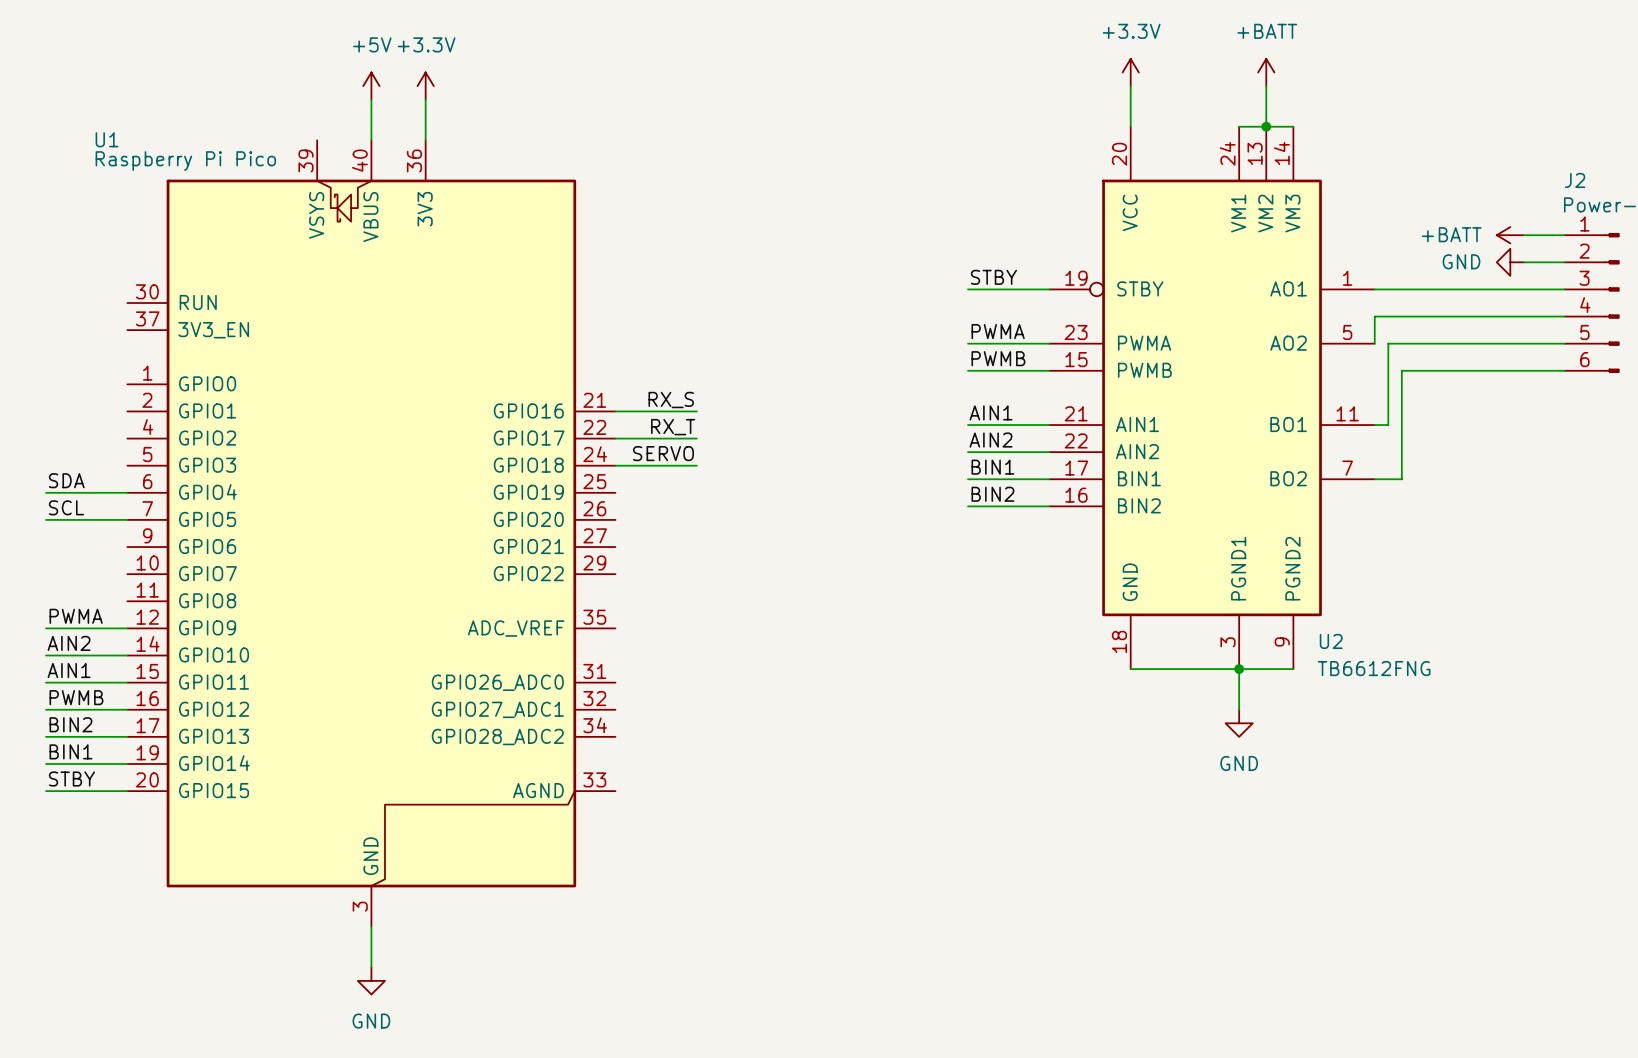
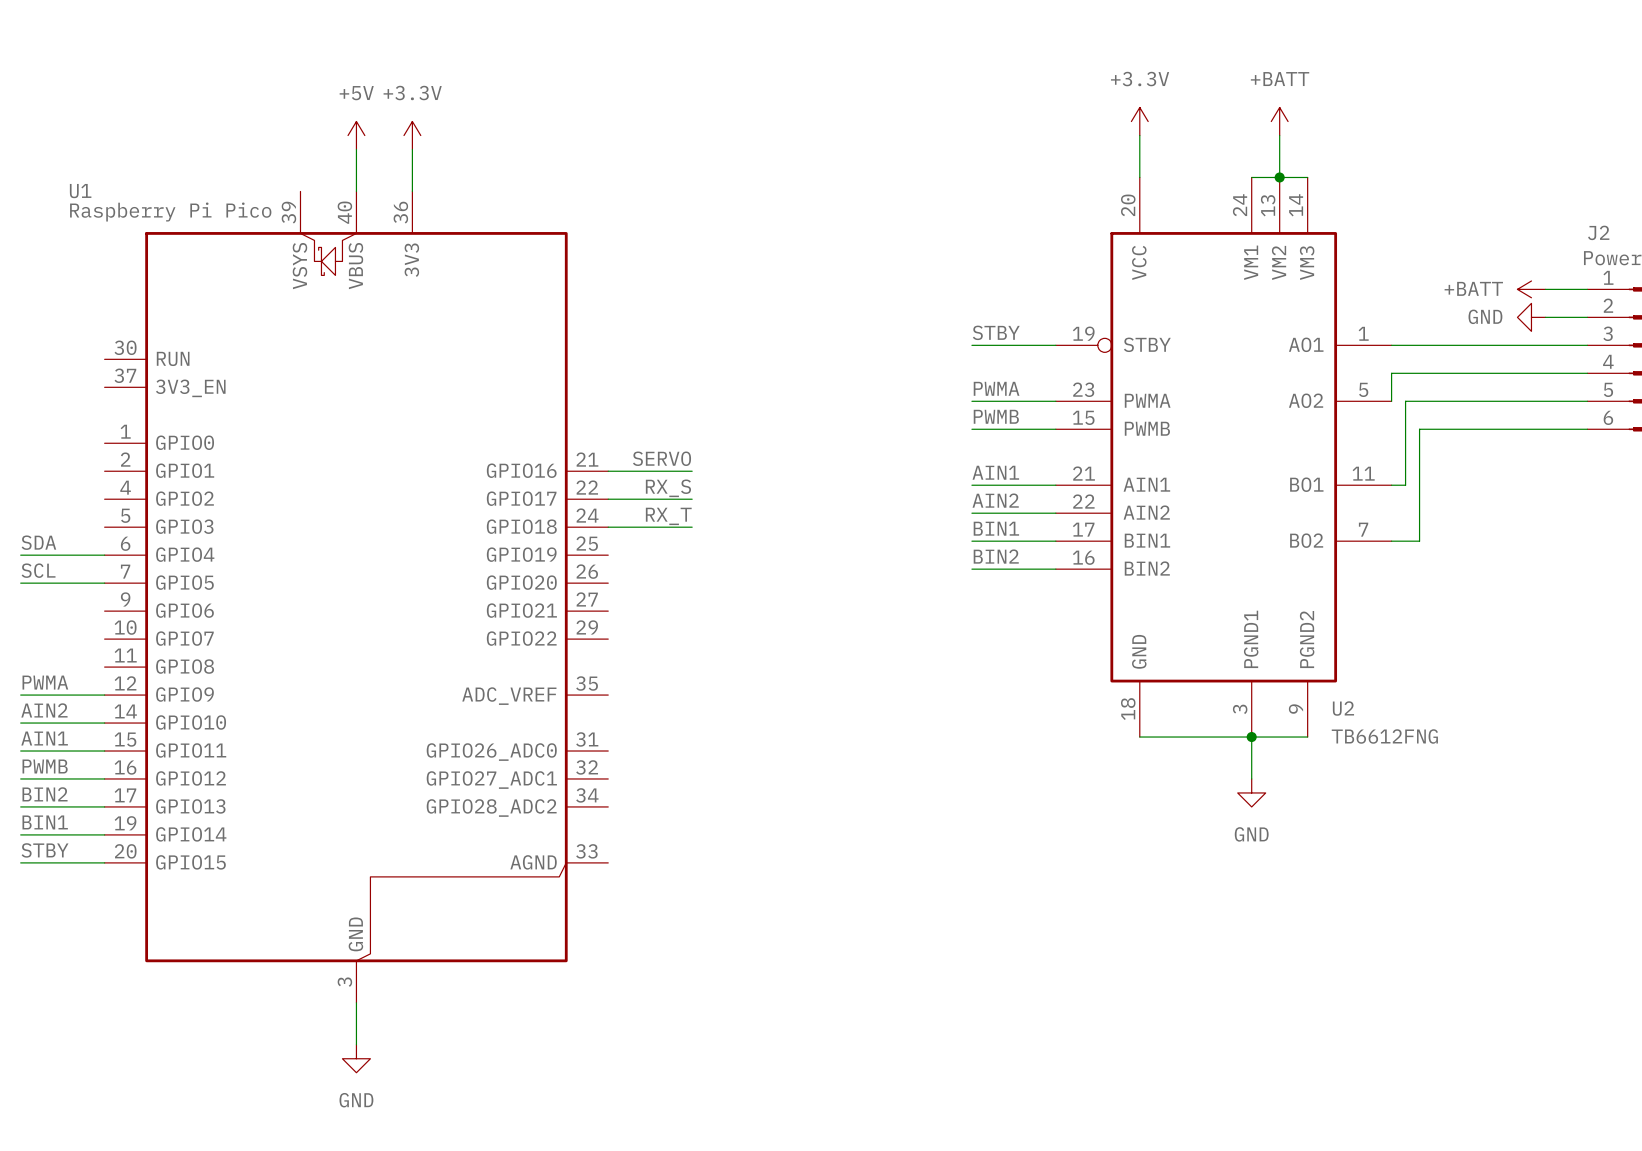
label: RX_S (671, 400) -> SERVO (661, 458)
label: RX_T (673, 427) -> RX_S (668, 488)
label: SERVO (663, 453) -> RX_T (668, 516)

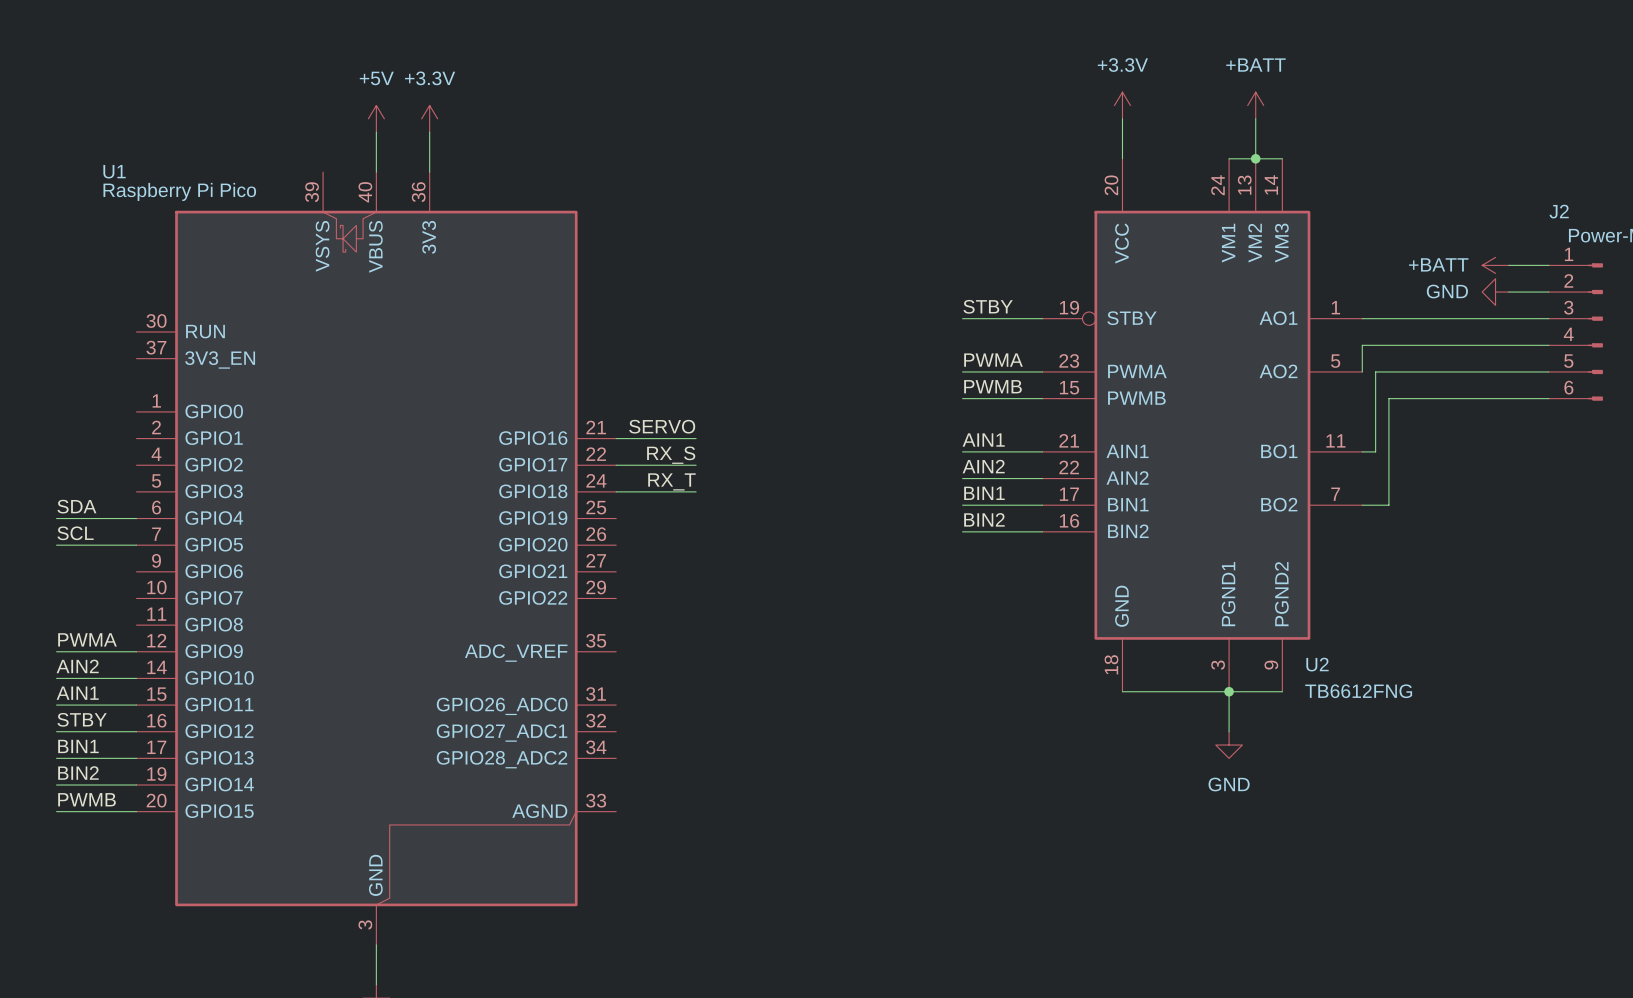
label: PWMB (45, 766) -> STBY (82, 719)
label: BIN2 (45, 794) -> BIN1 (78, 746)
label: BIN1 (45, 822) -> BIN2 (78, 773)
label: STBY (45, 850) -> PWMB (87, 799)

